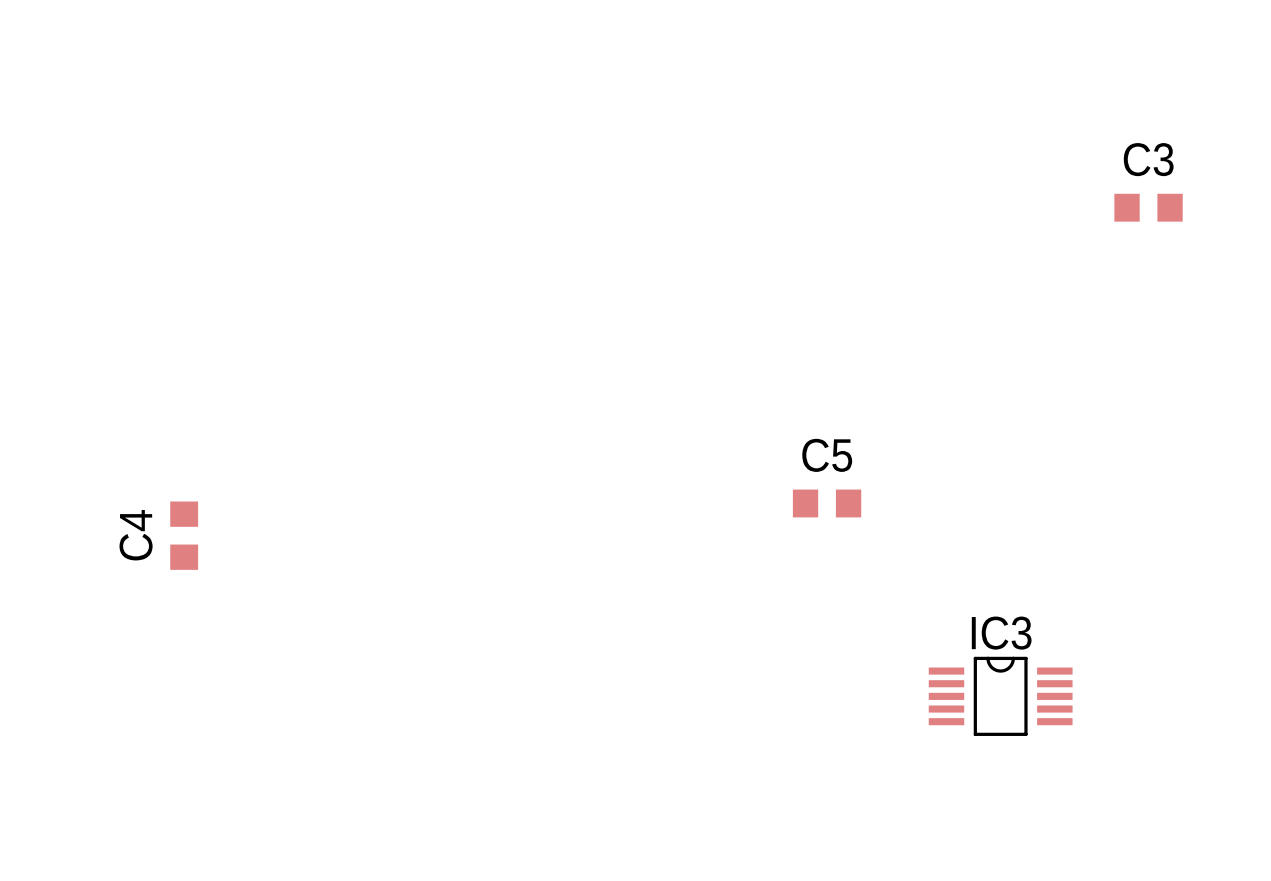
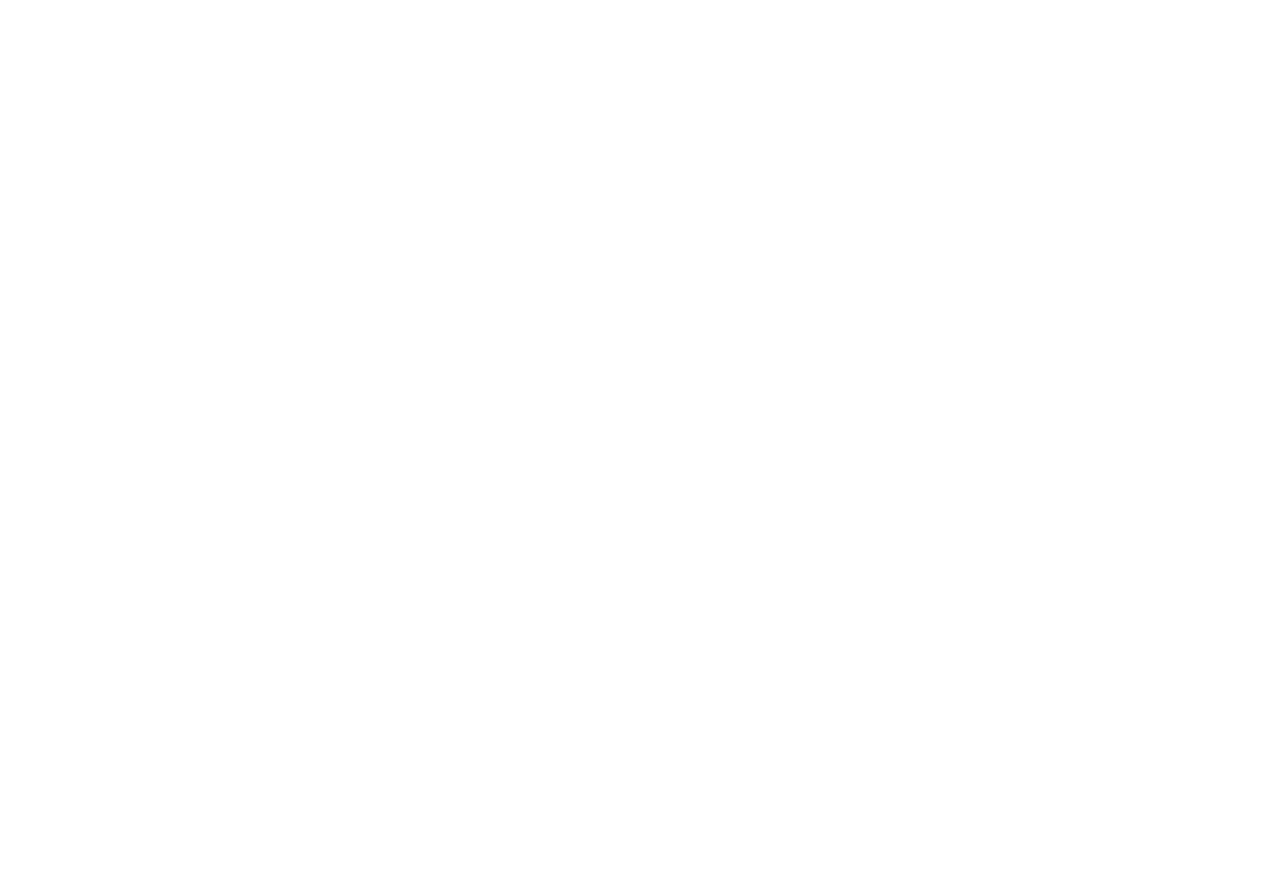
C3: (1148, 207) -> none
C5: (827, 503) -> none
C4: (184, 535) -> none
IC3: (1000, 696) -> none

